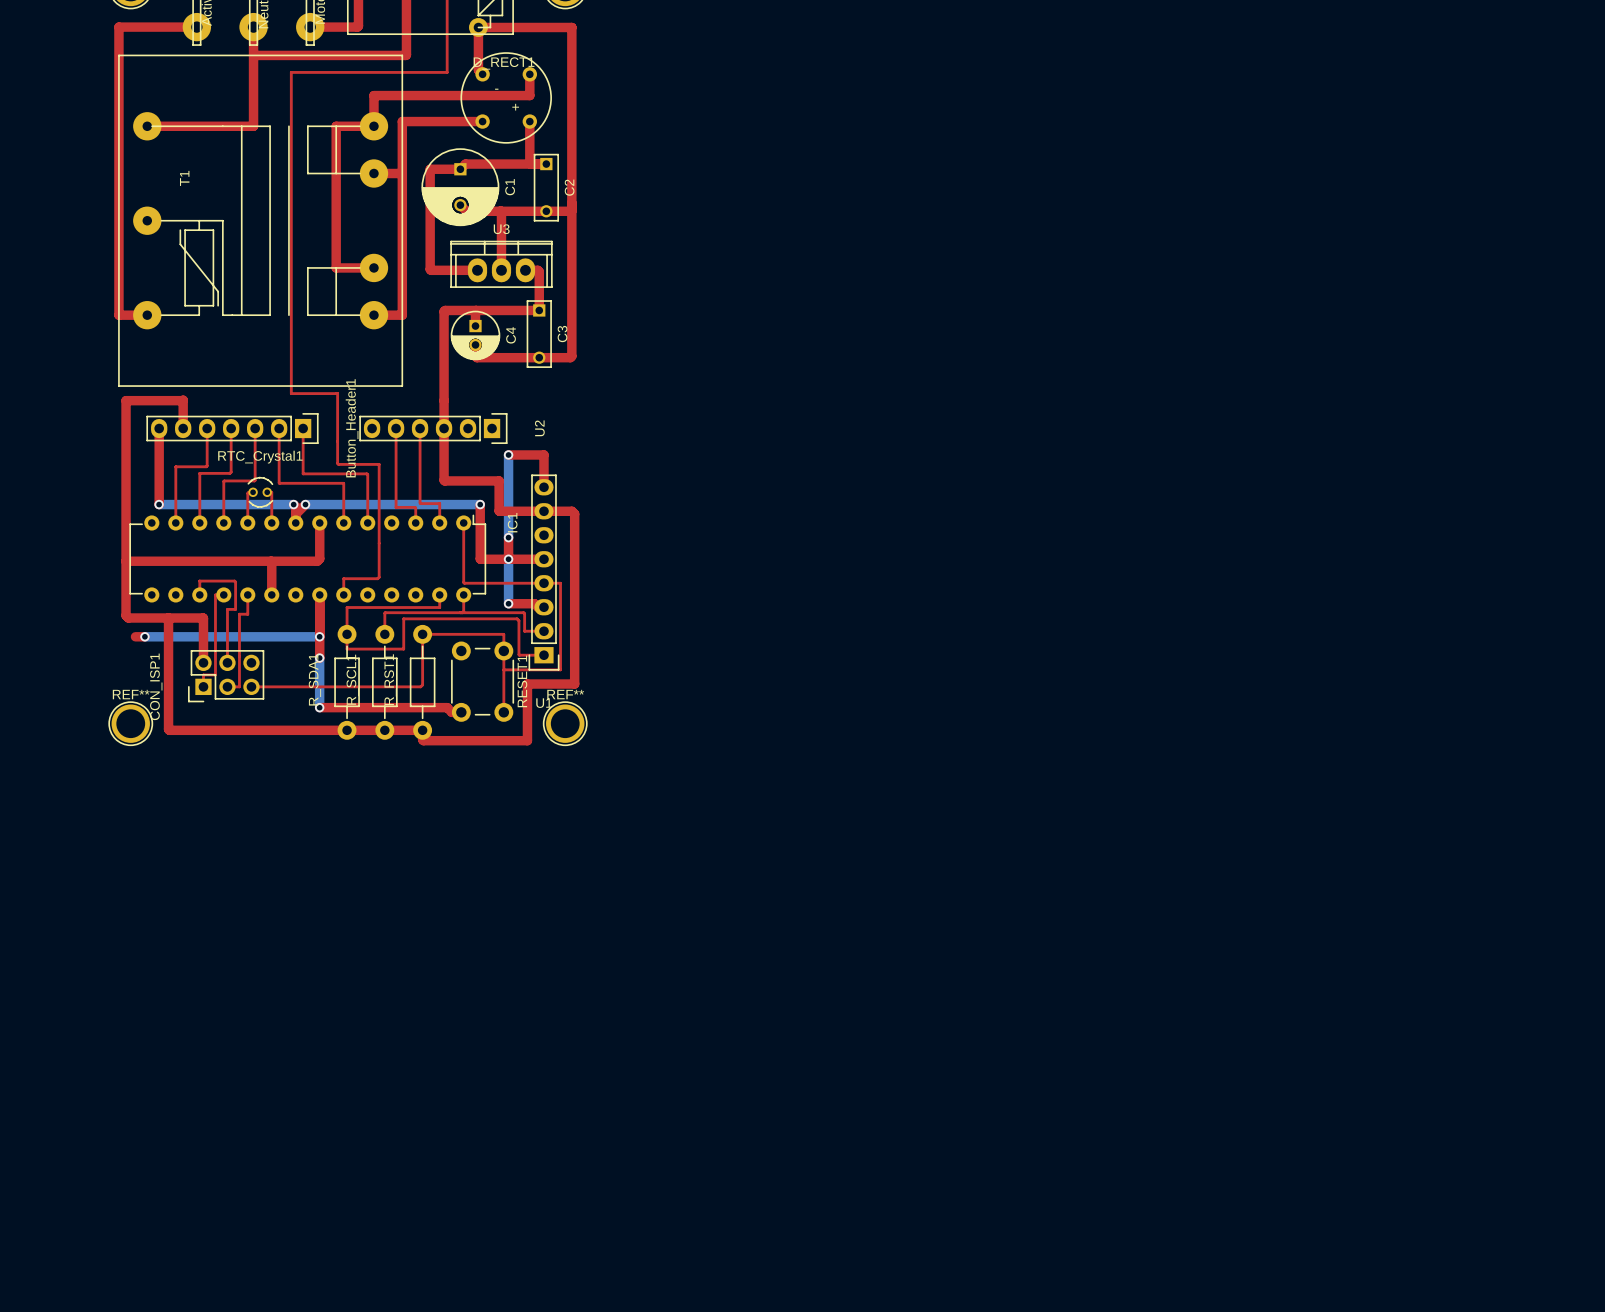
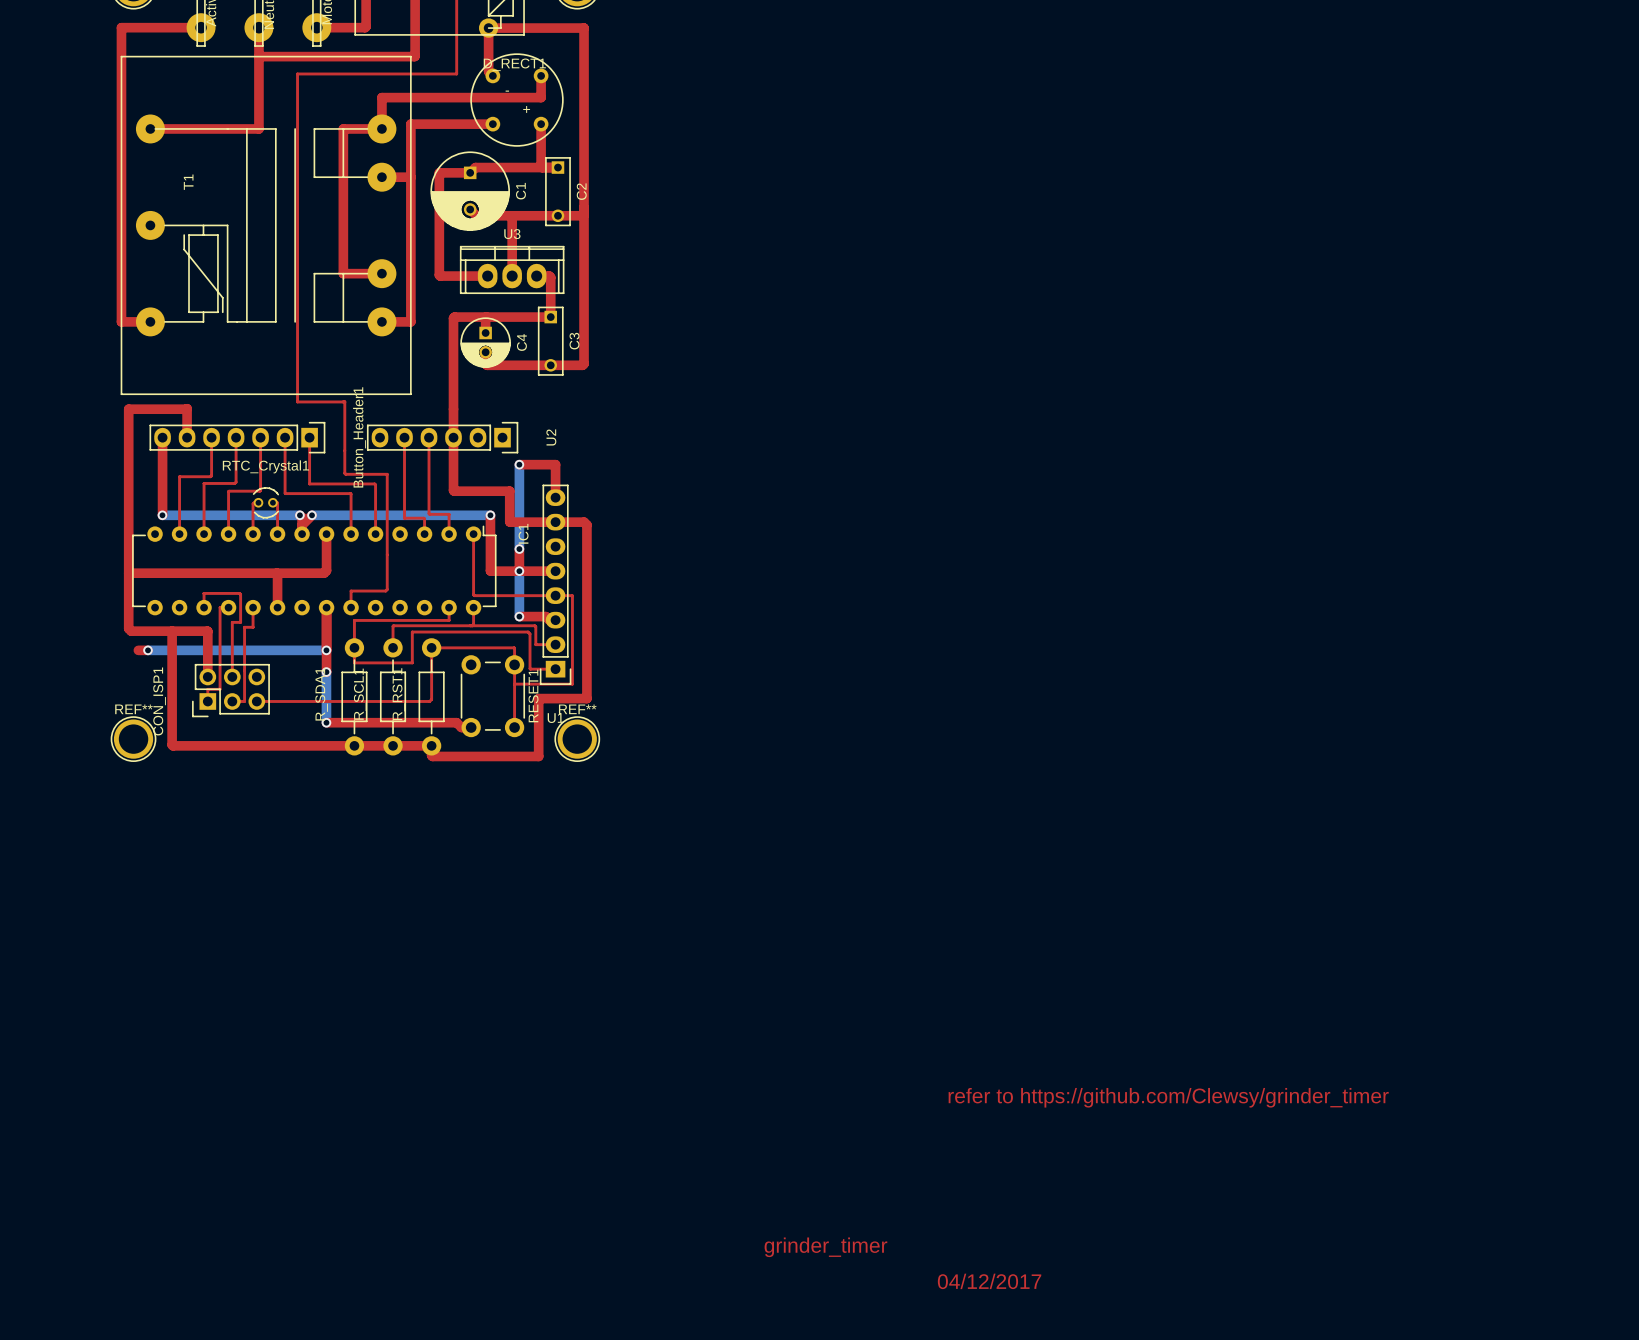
text: none -> refer to https://github.com/Clewsy/grinder_timer (1168, 1097)
text: none -> grinder_timer (825, 1247)
text: none -> 04/12/2017 (989, 1281)

